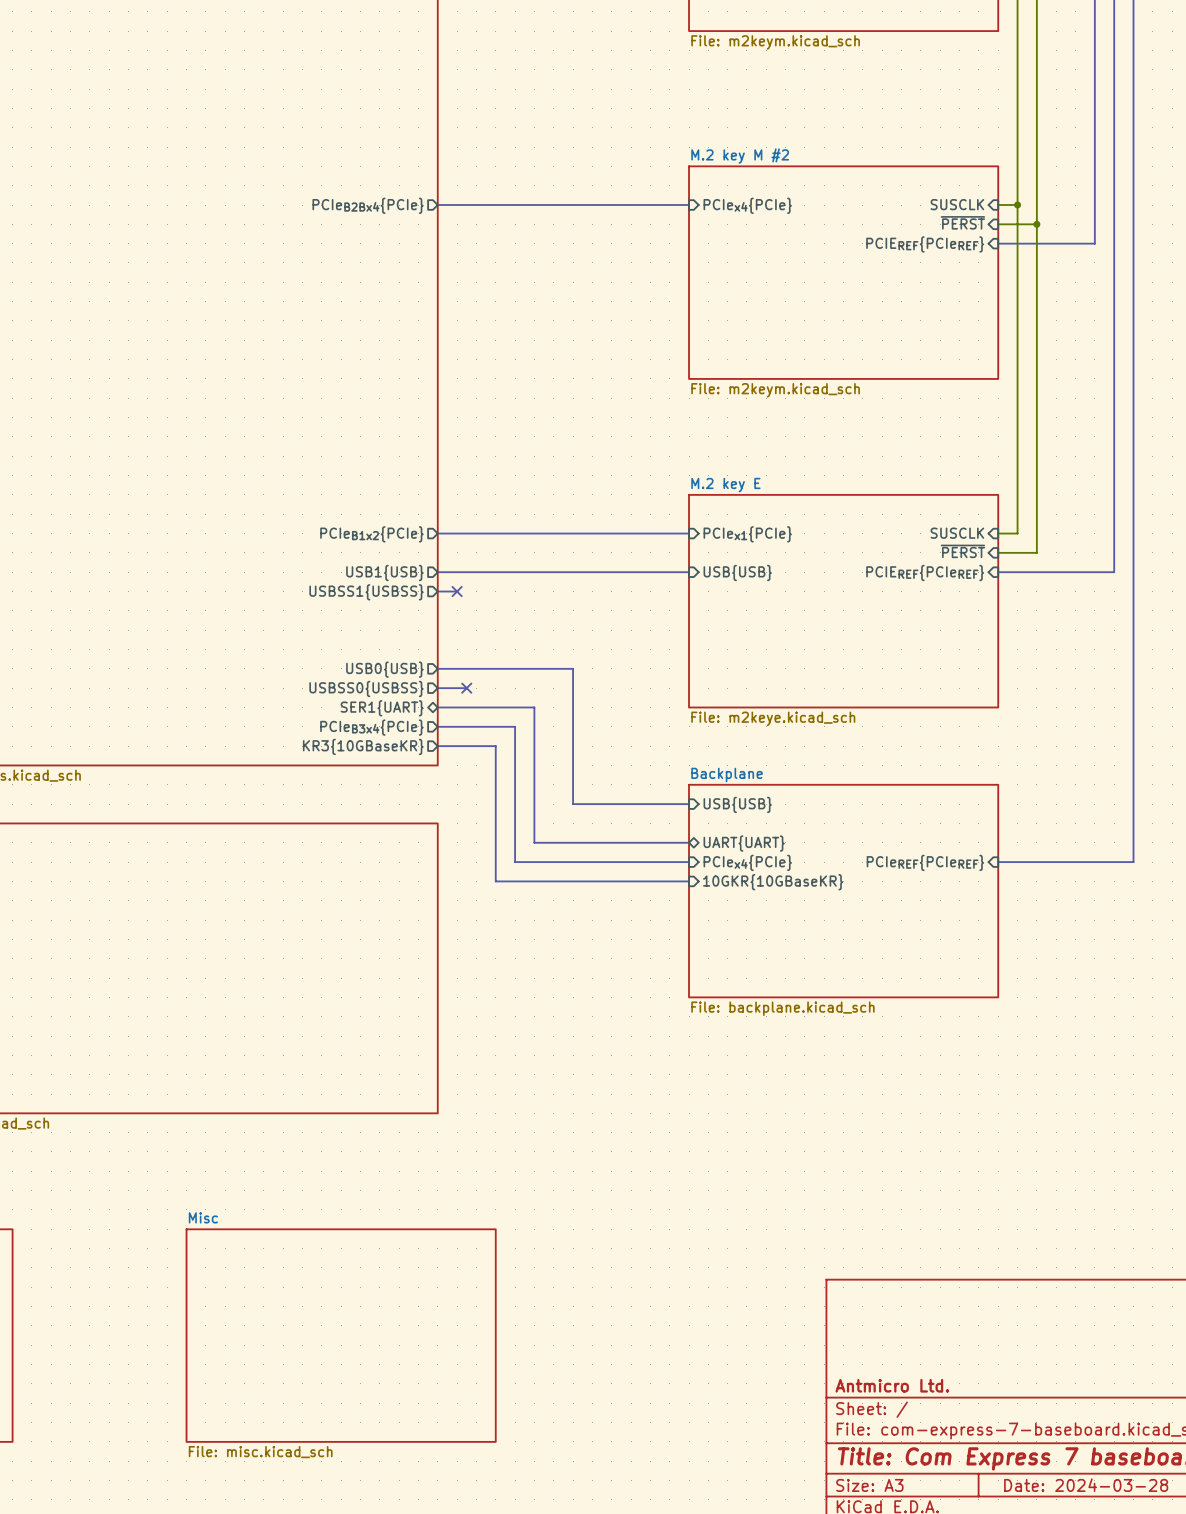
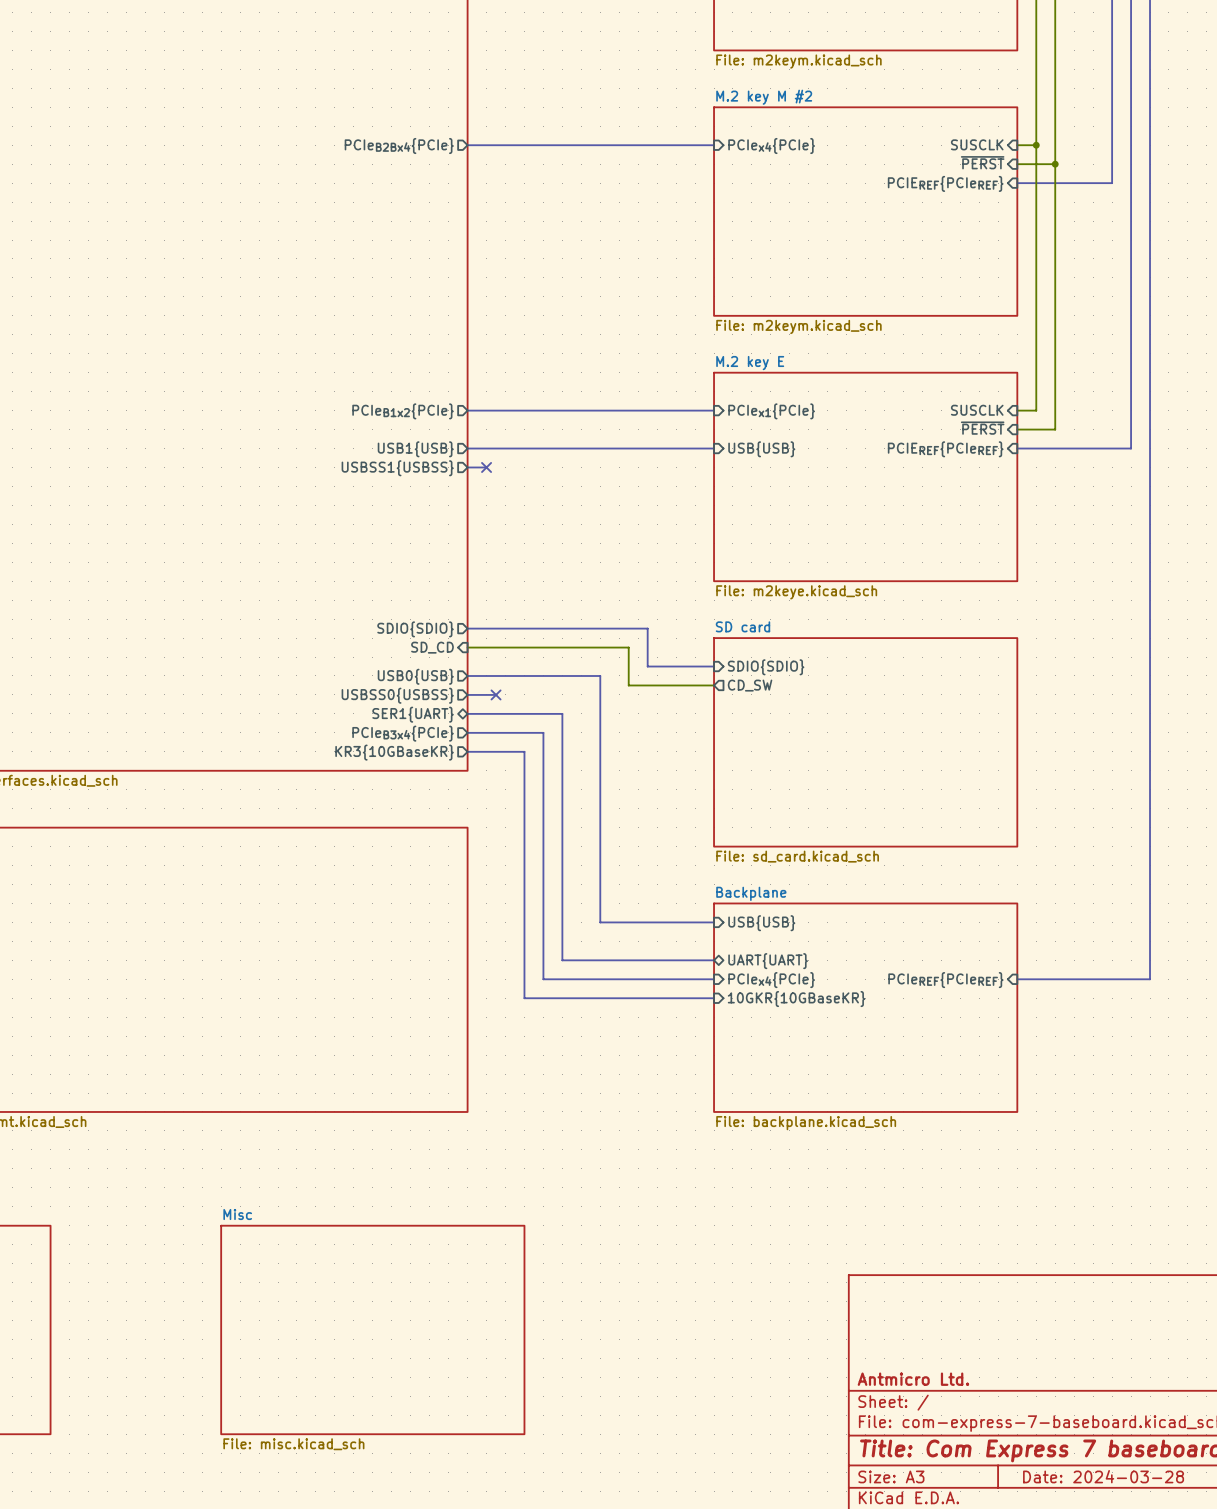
junction: none -> (1036, 145)
junction: none -> (1055, 164)
bus: (1094, 166) (1094, 243) (998, 243) -> (1112, 183) (1017, 183)
sheet pin position: SUSCLK (957, 204) -> SUSCLK (977, 144)
sheet pin position: PCIeB2Bx4{PCIe} (368, 205) -> PCIeB2Bx4{PCIe} (399, 146)
bus: (437, 205) (689, 205) -> (467, 145) (714, 145)
sheet pin position: PCIex4{PCIe} (747, 205) -> PCIex4{PCIe} (771, 146)
wire: (998, 205) (1017, 205) -> (1017, 145) (1036, 145)
junction: (1017, 205) -> none
sheet pin position: ~{PERST} (962, 222) -> ~{PERST} (982, 162)
wire: (998, 224) (1036, 224) -> (1017, 164) (1055, 164)
junction: (1036, 224) -> none
sheet pin position: PCIEREF{PCIeREF} (925, 244) -> PCIEREF{PCIeREF} (945, 183)
sheet M.2 key M #2 position: (843, 272) -> (865, 211)
sheet pin: none -> SUSCLK (977, 410)
wire: (1017, 398) (1017, 533) (998, 533) -> (1036, 410) (1017, 410)
sheet pin: none -> ~{PERST} (982, 428)
wire: (1036, 417) (1036, 552) (998, 552) -> (1055, 429) (1017, 429)
bus: (1114, 436) (1114, 572) (998, 572) -> (1131, 448) (1017, 448)
sheet pin: none -> PCIEREF{PCIeREF} (945, 449)
no-connect mark: none -> (486, 467)
bus: (437, 533) (689, 533) -> (467, 410) (714, 410)
sheet pin: SUSCLK (957, 533) -> none
sheet pin position: PCIeB1x2{PCIe} (371, 534) -> PCIeB1x2{PCIe} (403, 411)
sheet pin position: PCIex1{PCIe} (747, 534) -> PCIex1{PCIe} (771, 411)
sheet pin: ~{PERST} (962, 551) -> none
sheet pin position: USB1{USB} (384, 572) -> USB1{USB} (415, 449)
bus: (437, 572) (689, 572) -> (467, 448) (714, 448)
sheet pin position: USB{USB} (737, 572) -> USB{USB} (761, 449)
sheet pin: PCIEREF{PCIeREF} (925, 572) -> none
bus: (437, 591) (457, 591) -> (467, 467) (486, 467)
no-connect mark: (457, 591) -> none
sheet pin position: USBSS1{USBSS} (366, 592) -> USBSS1{USBSS} (397, 468)
sheet M.2 key E position: (843, 601) -> (865, 476)
bus: none -> (467, 628) (647, 628) (647, 666) (714, 666)
sheet pin: none -> SDIO{SDIO} (415, 629)
sheet pin: none -> SD_CD (432, 647)
wire: none -> (467, 647) (628, 647) (628, 685) (714, 685)
sheet pin: none -> SDIO{SDIO} (766, 667)
sheet pin: none -> CD_SW (750, 685)
sheet SD card: none -> File: sd_card.kicad_sch (865, 742)
bus: (573, 804) (689, 804) -> (600, 808) (600, 922) (714, 922)
sheet pin position: USB{USB} (737, 804) -> USB{USB} (761, 923)
bus: (534, 842) (689, 842) -> (562, 846) (562, 960) (714, 960)
sheet pin position: UART{UART} (744, 843) -> UART{UART} (768, 961)
bus: (515, 862) (689, 862) -> (543, 865) (543, 979) (714, 979)
sheet pin position: PCIex4{PCIe} (747, 862) -> PCIex4{PCIe} (771, 980)
sheet pin position: PCIeREF{PCIeREF} (925, 862) -> PCIeREF{PCIeREF} (945, 980)
bus: (998, 862) (1133, 862) -> (1017, 979) (1150, 979) (1150, 865)
bus: (495, 881) (689, 881) -> (524, 884) (524, 998) (714, 998)
sheet pin position: 10GKR{10GBaseKR} (773, 882) -> 10GKR{10GBaseKR} (796, 999)
sheet Backplane position: (843, 891) -> (865, 1007)

